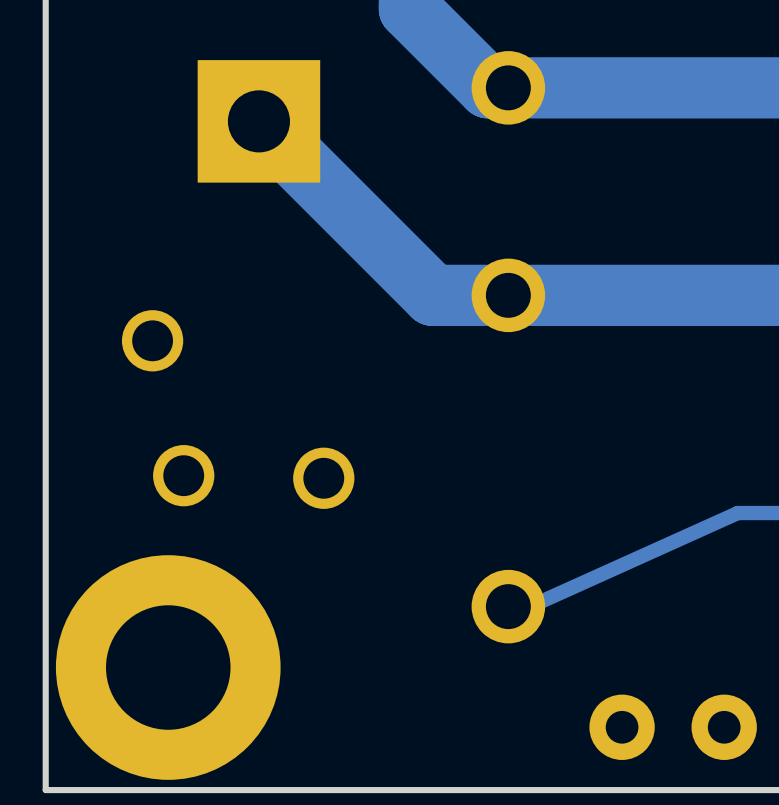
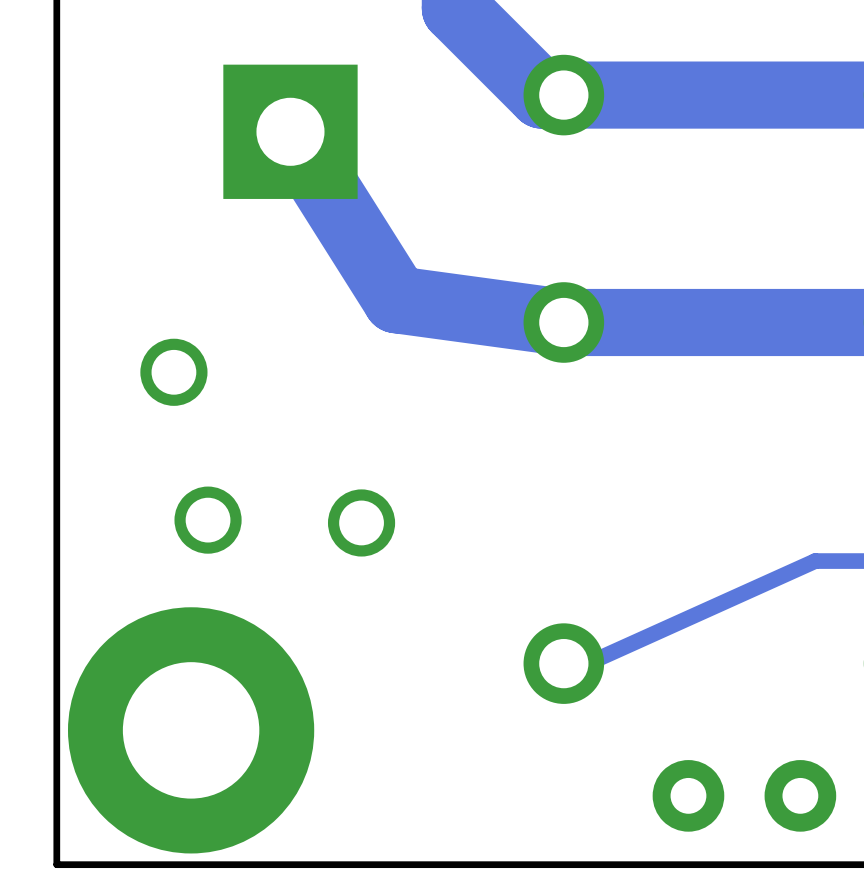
track: (258, 121) (432, 295) (508, 295) -> (290, 131) (396, 299) (563, 322)

